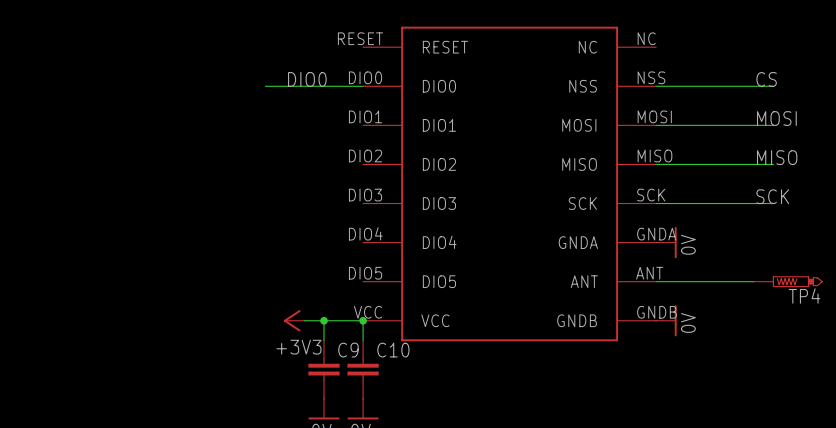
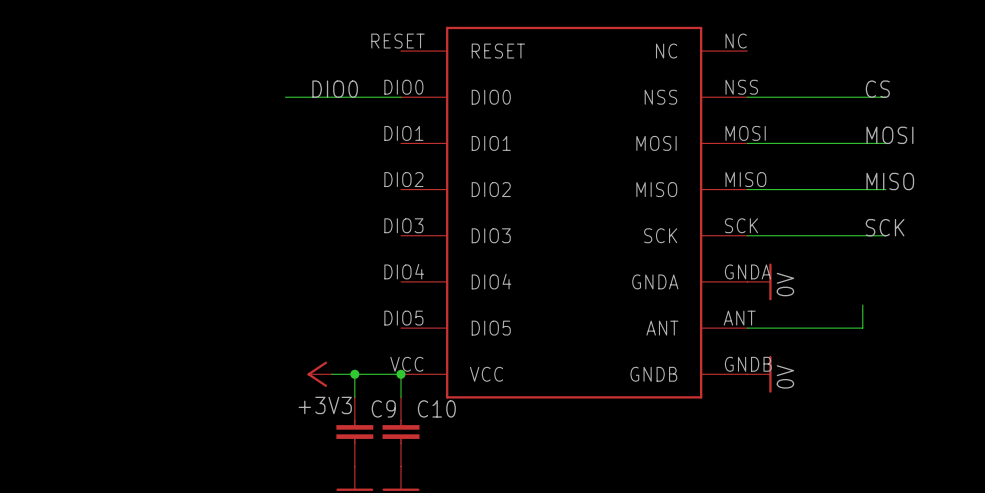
wire: none -> (862, 305) (862, 328)
TP4: (788, 281) -> none

